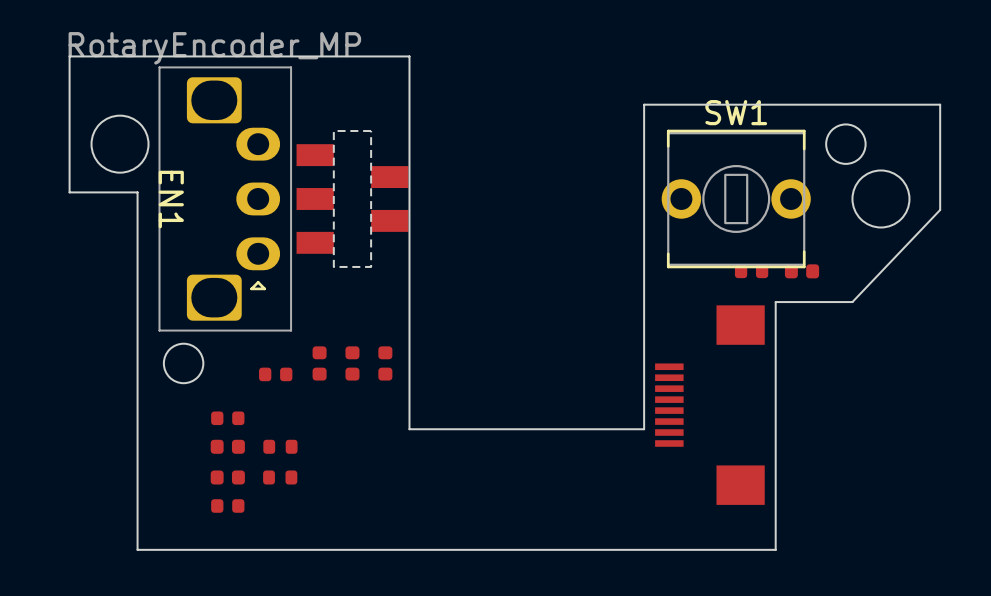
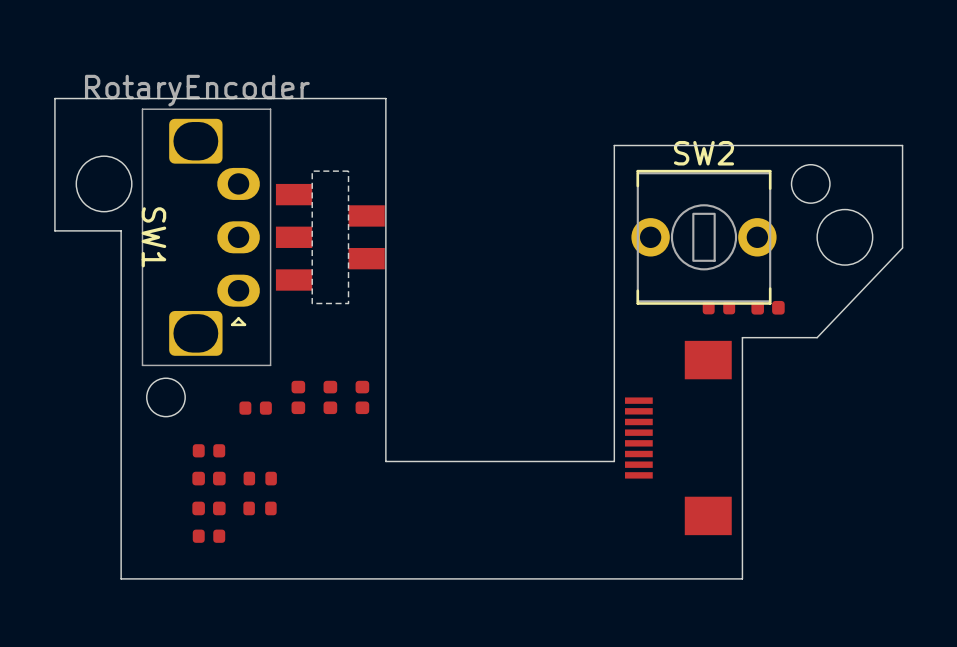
EN1 value: RotaryEncoder_MP (214, 48) -> RotaryEncoder (197, 90)
SW1 name: SW1 (736, 112) -> SW2 (703, 153)
EN1 name: EN1 (171, 199) -> SW1 (153, 237)

